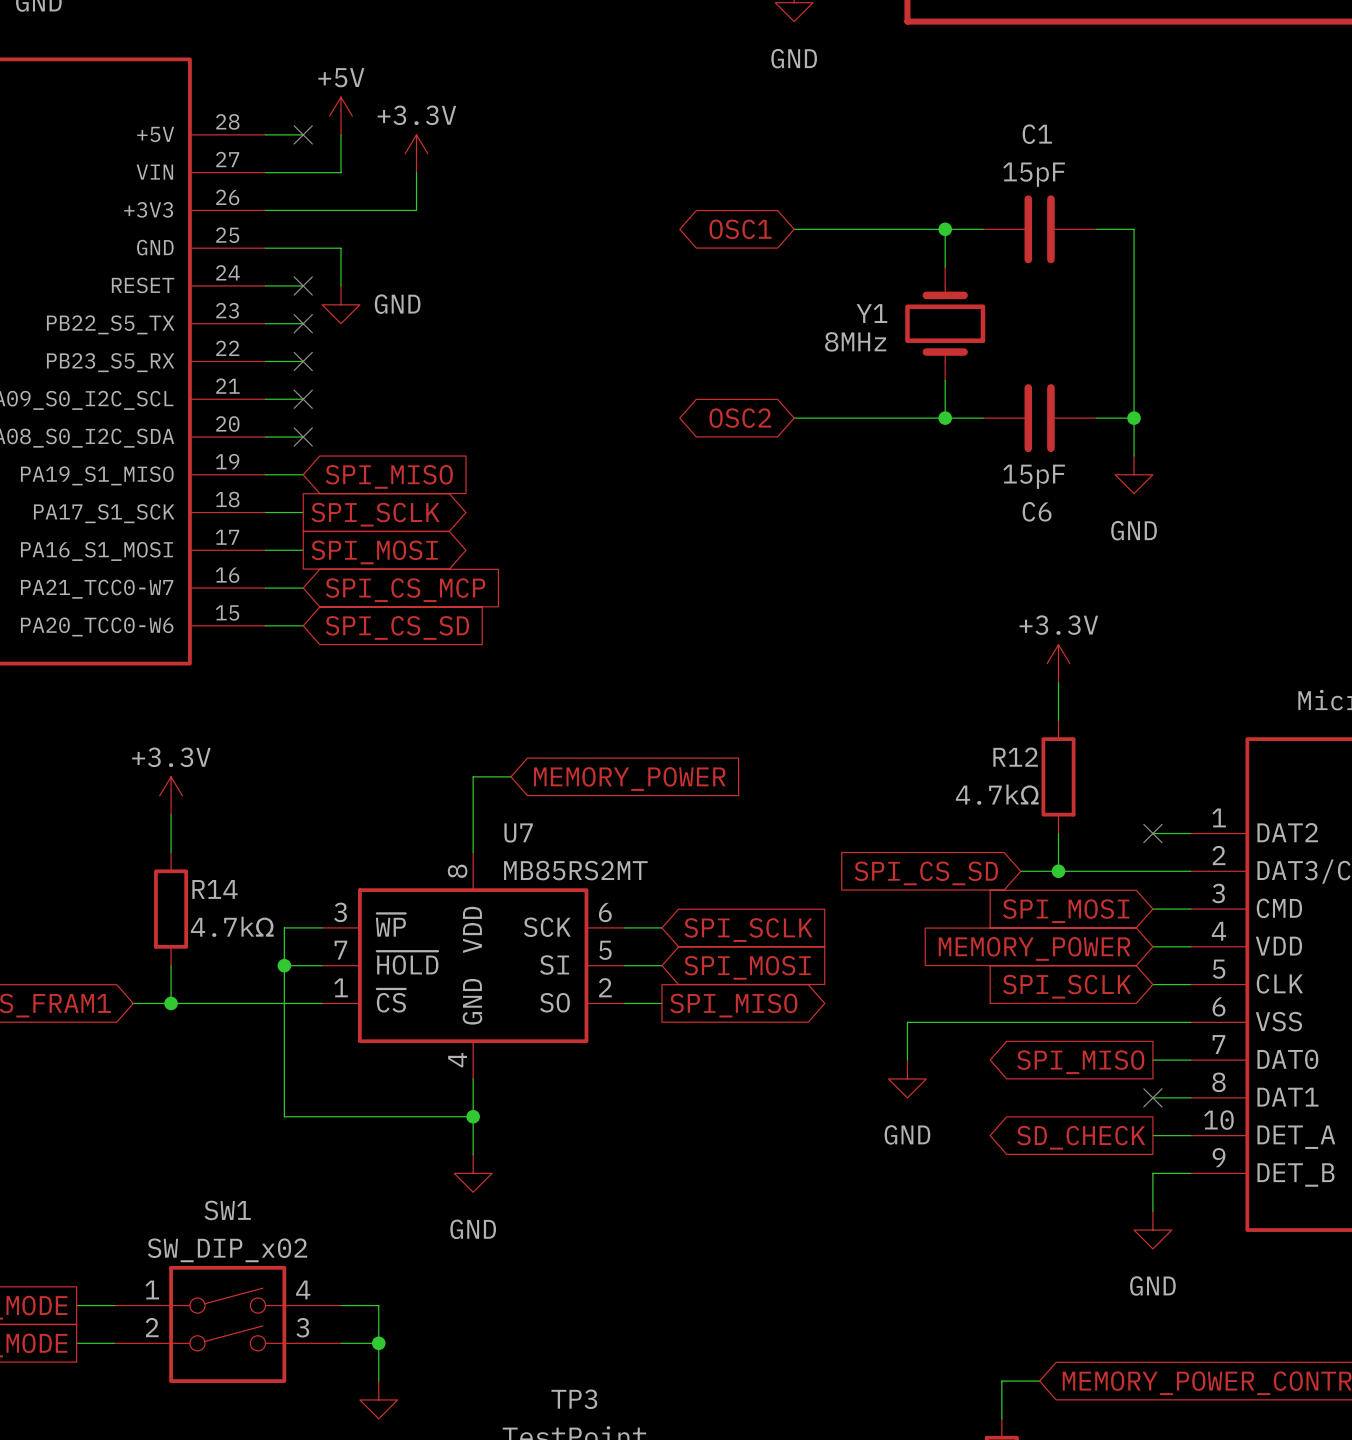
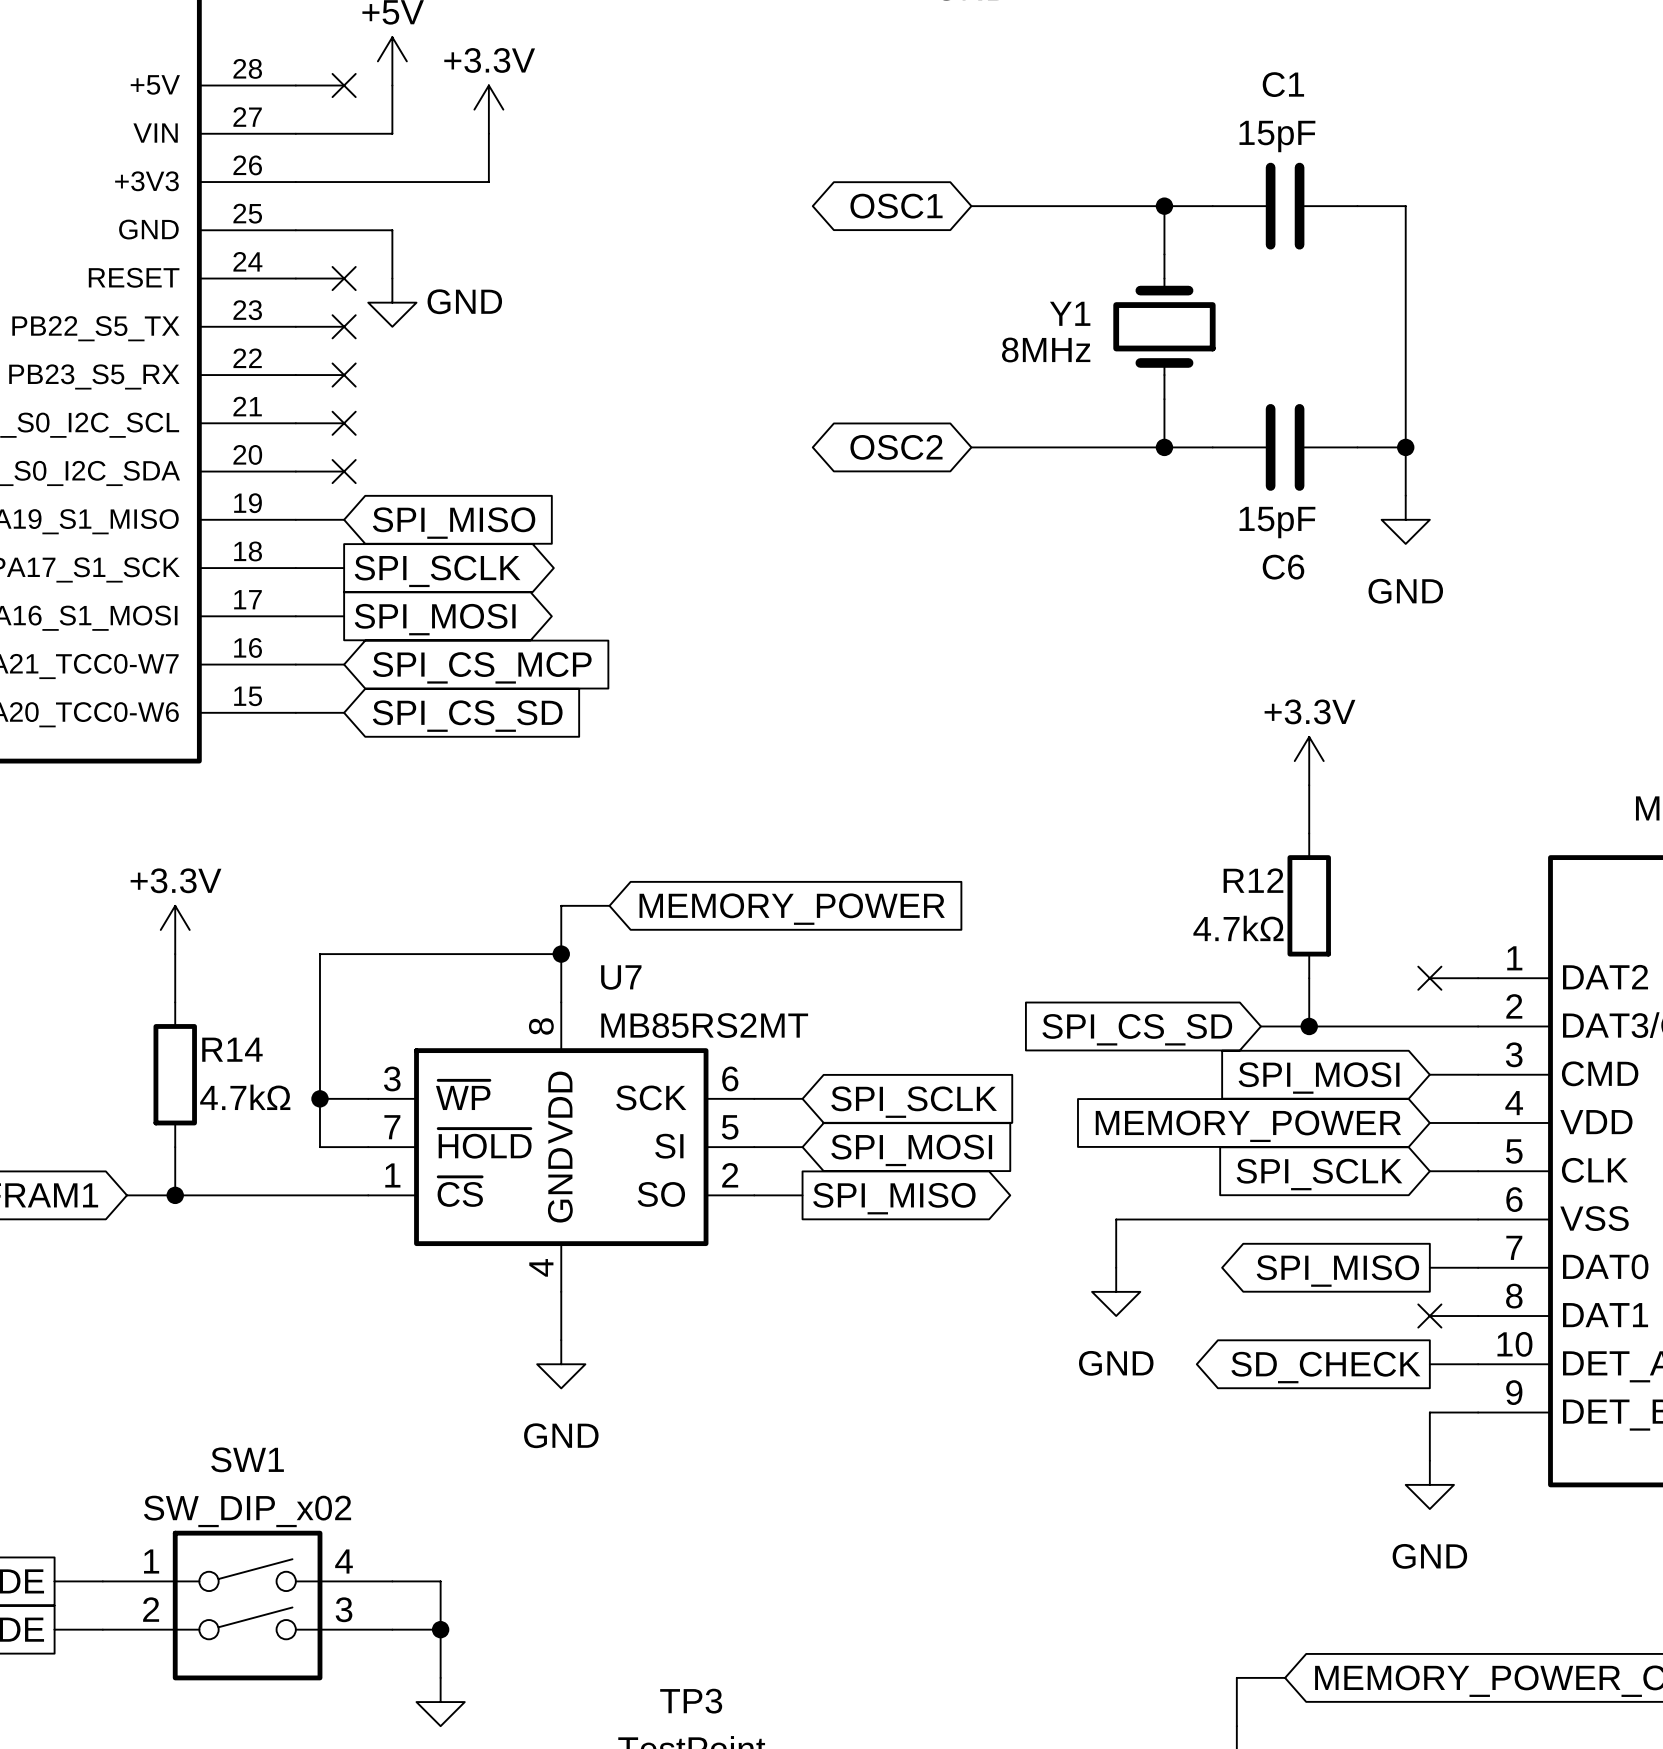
wire: none -> (561, 954) (319, 954) (319, 1098)
junction: none -> (561, 954)
wire: (284, 965) (284, 1116) (473, 1116) (473, 1154) -> none
junction position: (284, 965) -> (319, 1098)
junction: (473, 1116) -> none
power symbol position: GND (473, 1173) -> GND (561, 1364)

